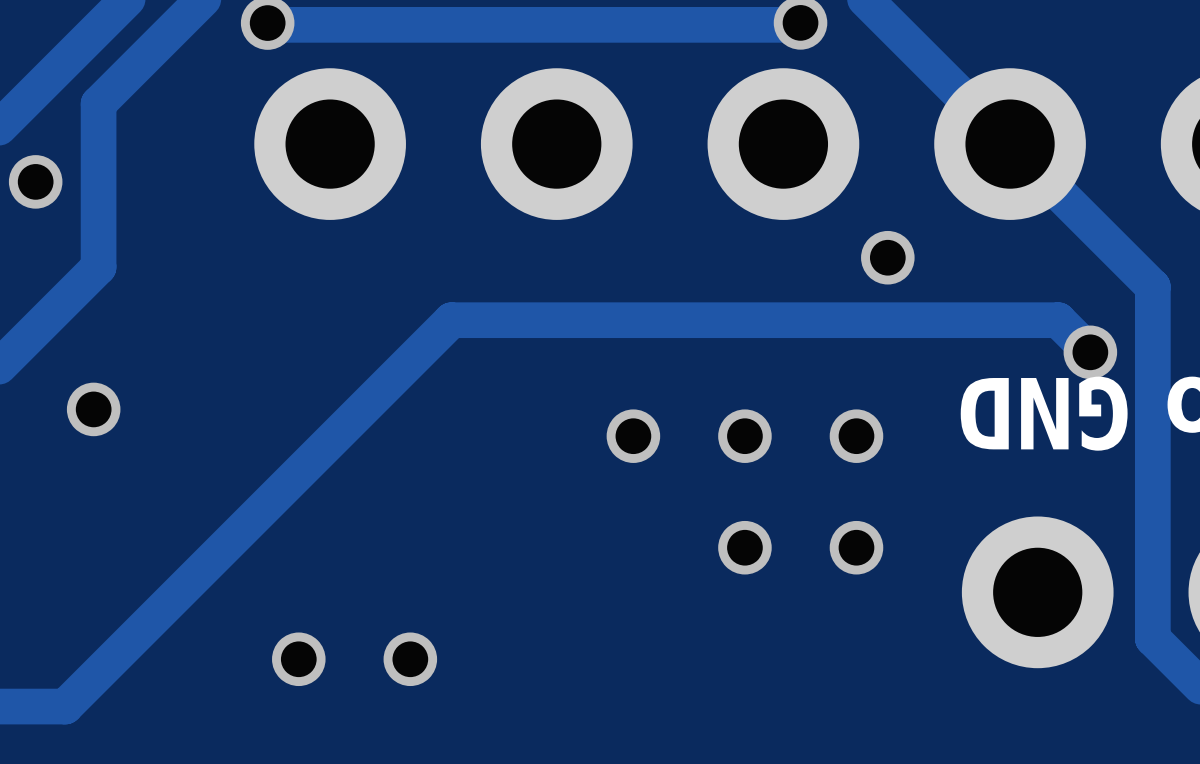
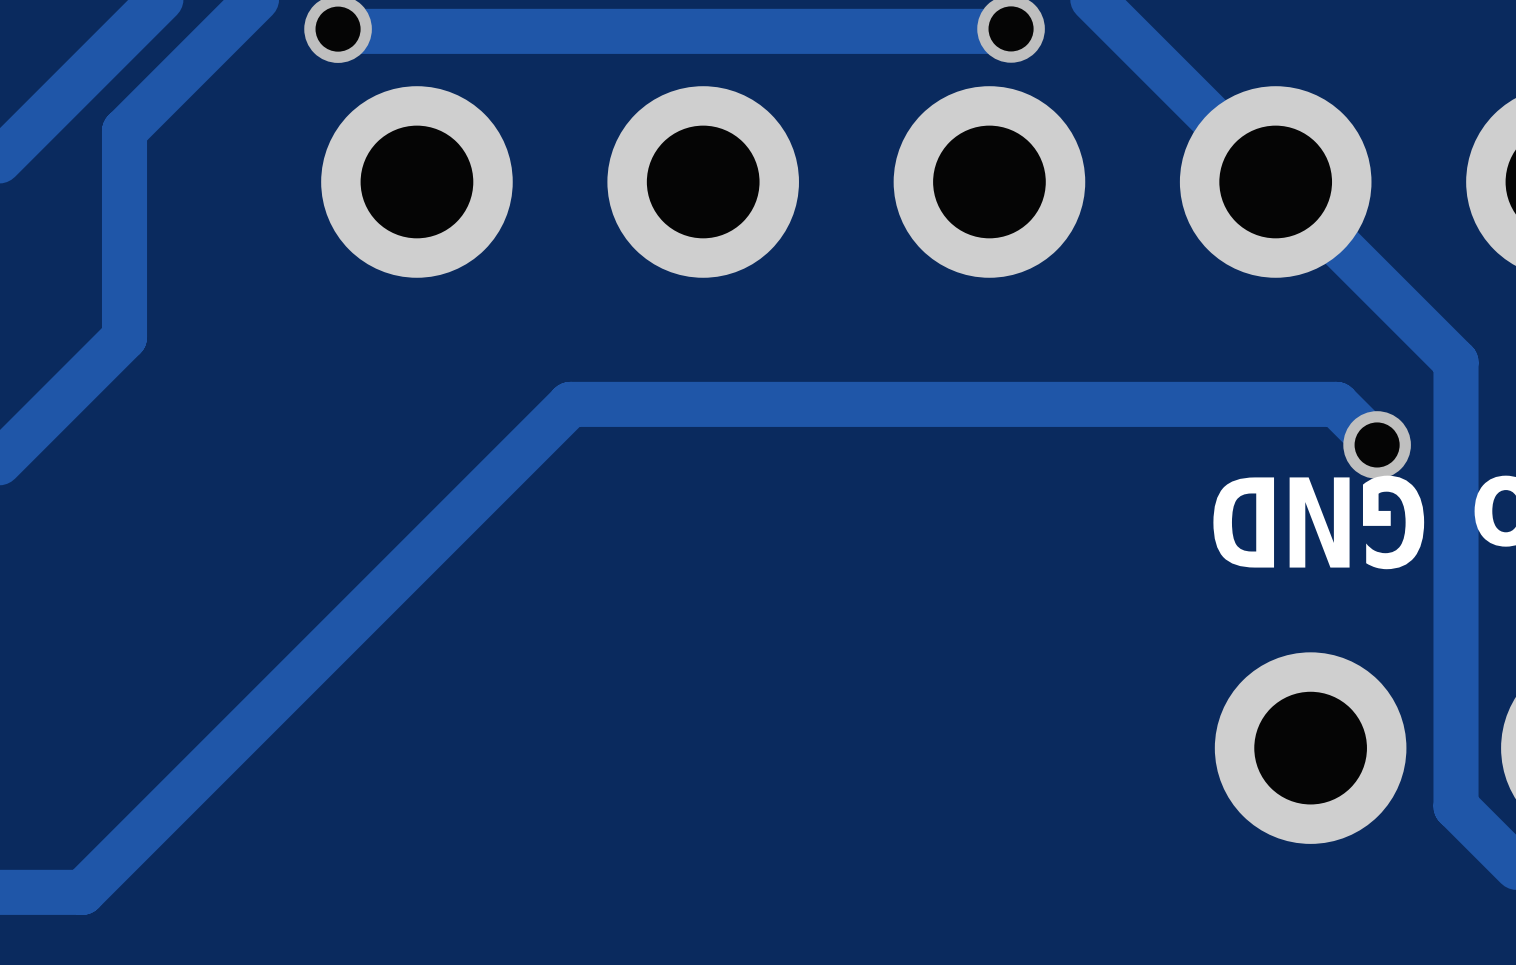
via: (35, 181) -> none
via: (887, 257) -> none
via: (93, 409) -> none
via: (633, 436) -> none
via: (744, 436) -> none
via: (856, 436) -> none
via: (744, 547) -> none
via: (856, 547) -> none
via: (298, 659) -> none
via: (410, 659) -> none

